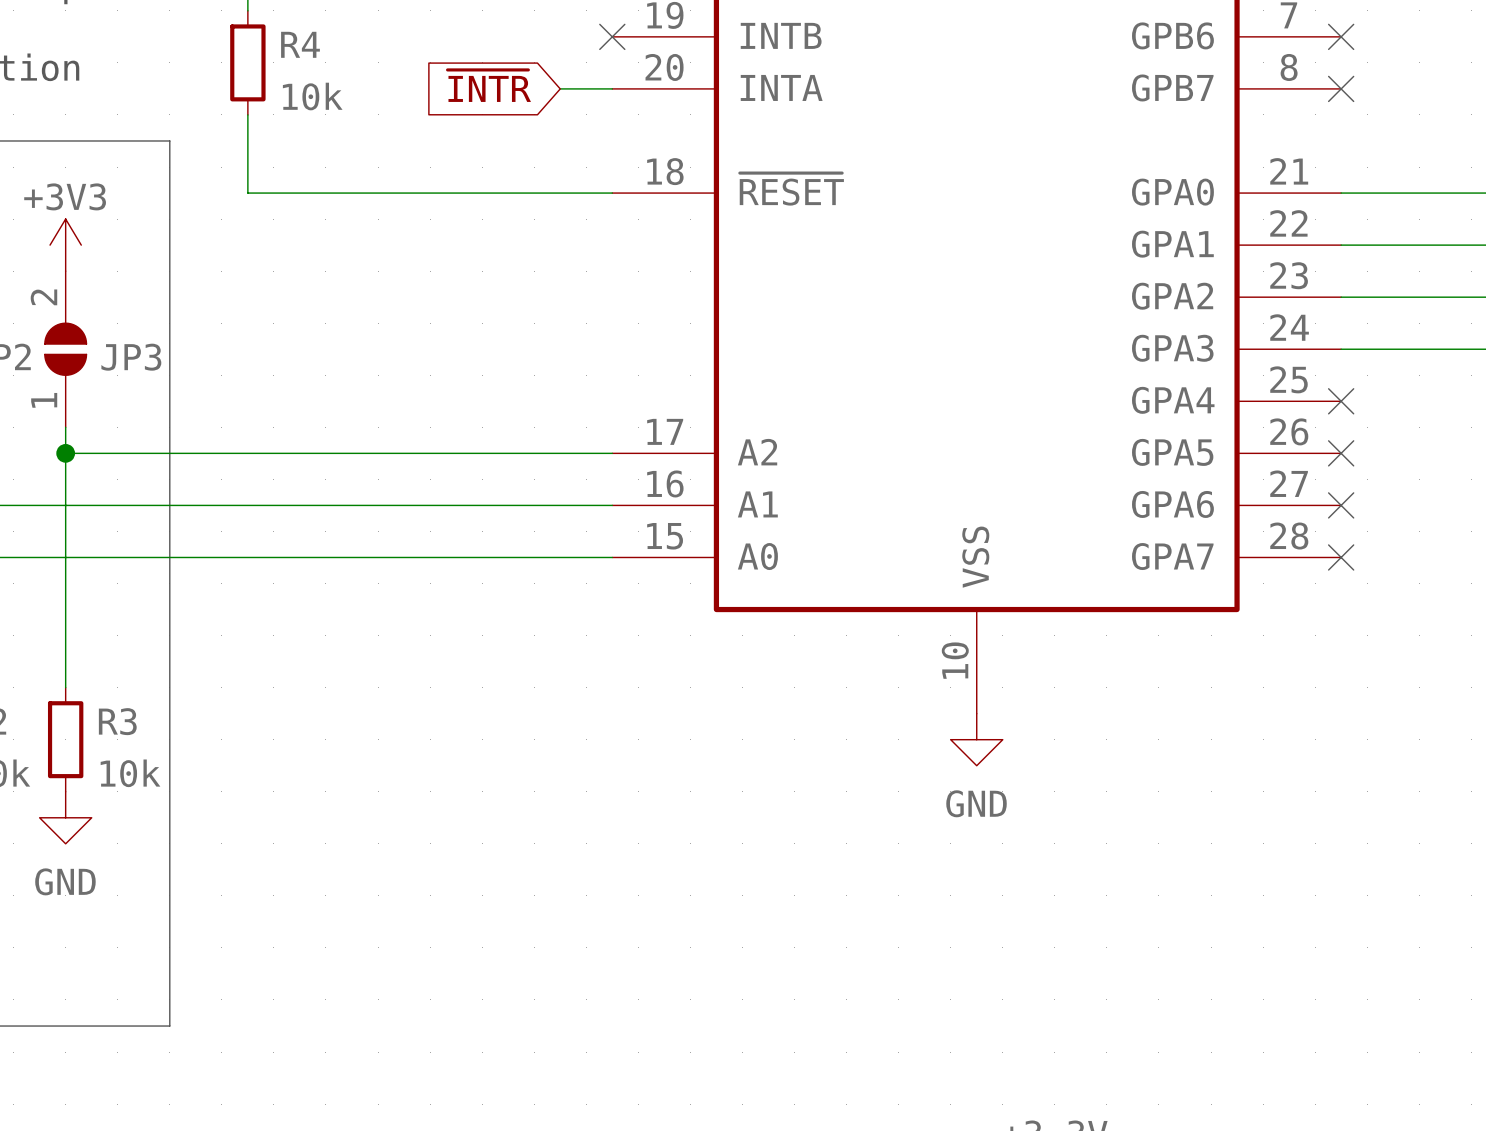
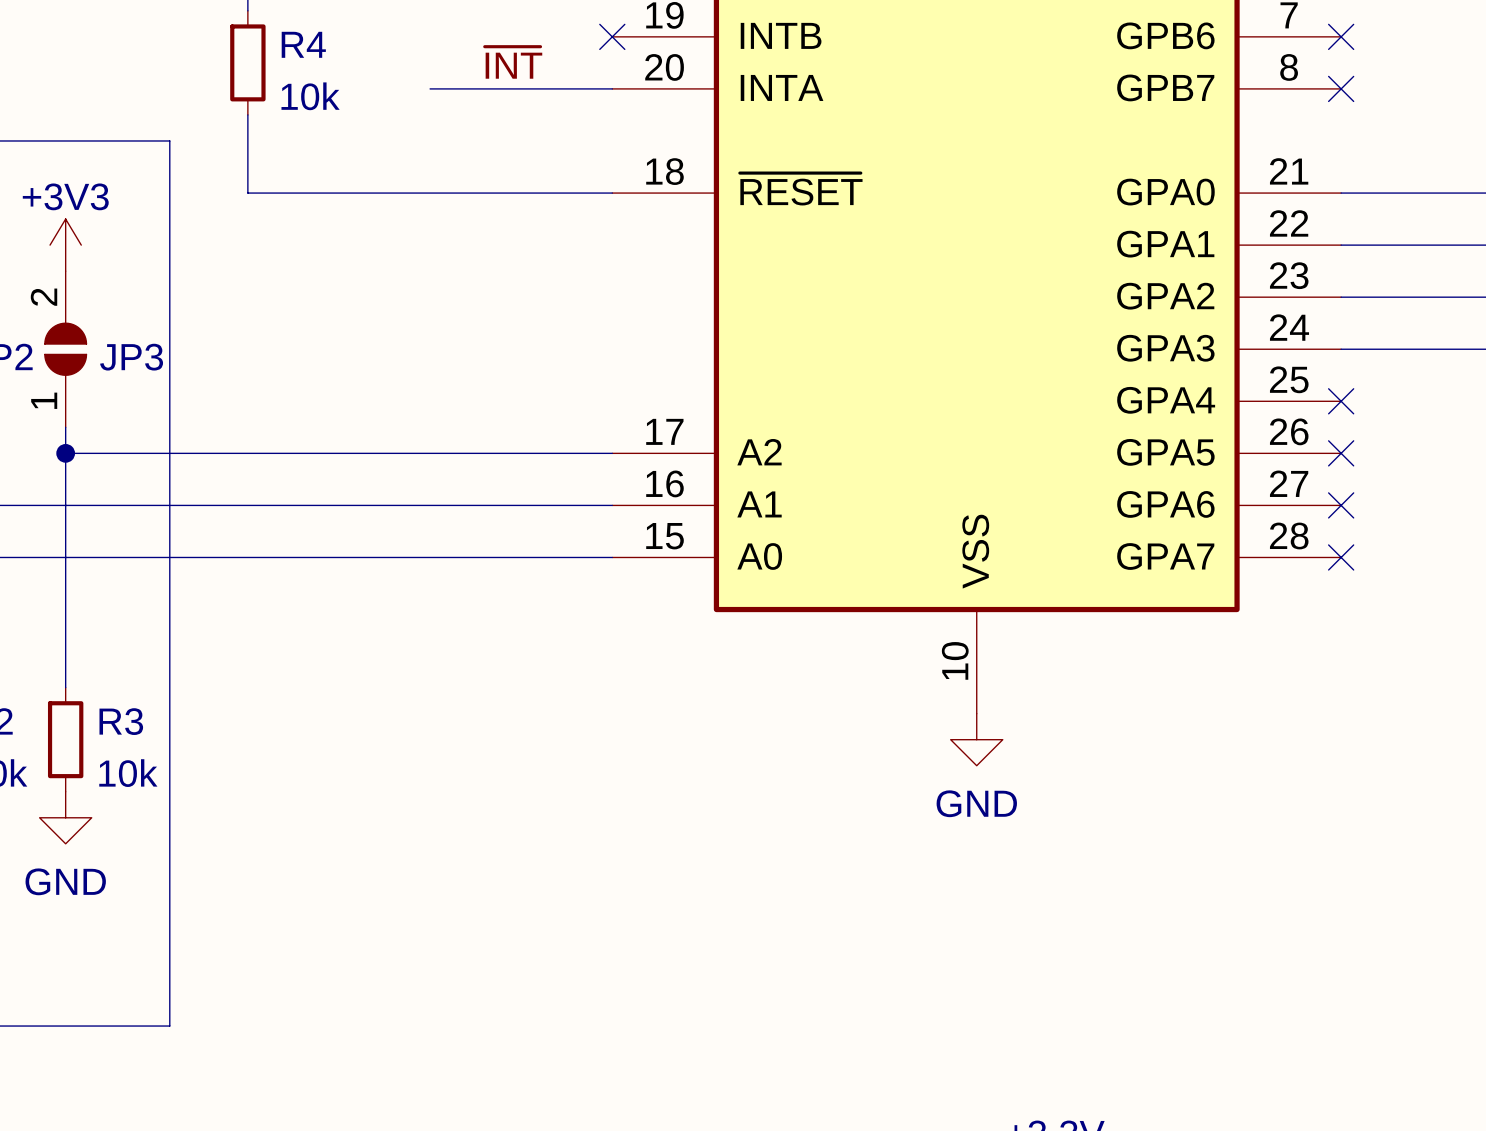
label: none -> ~{INT} (513, 62)
global label: ~{INTR} (489, 85) -> none
wire: none -> (430, 88) (560, 88)

